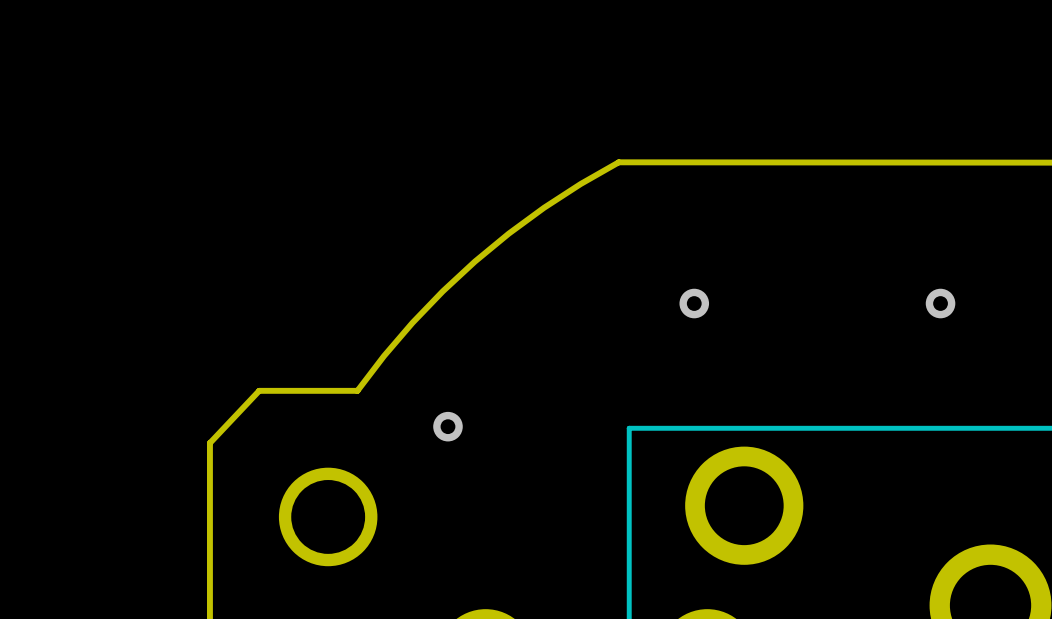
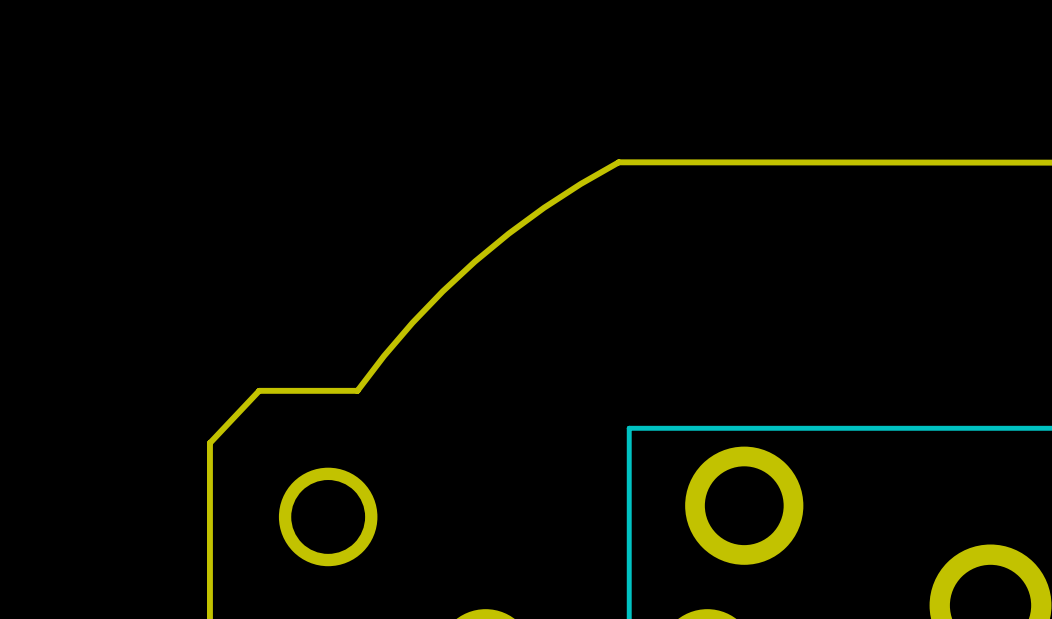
via: (694, 303) -> none
via: (940, 303) -> none
via: (447, 426) -> none

